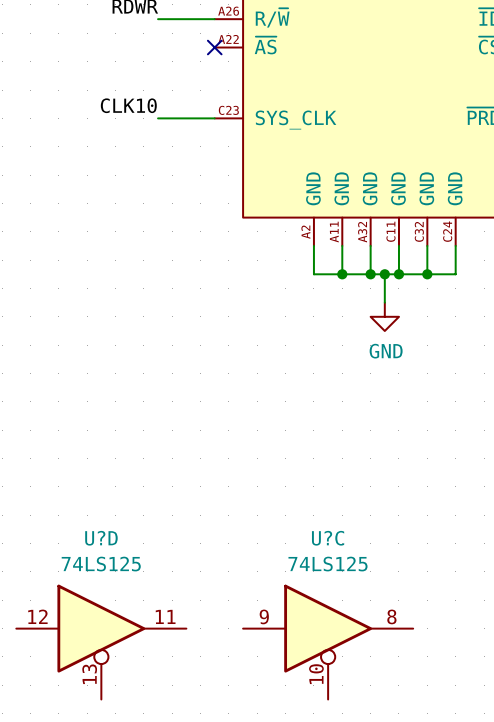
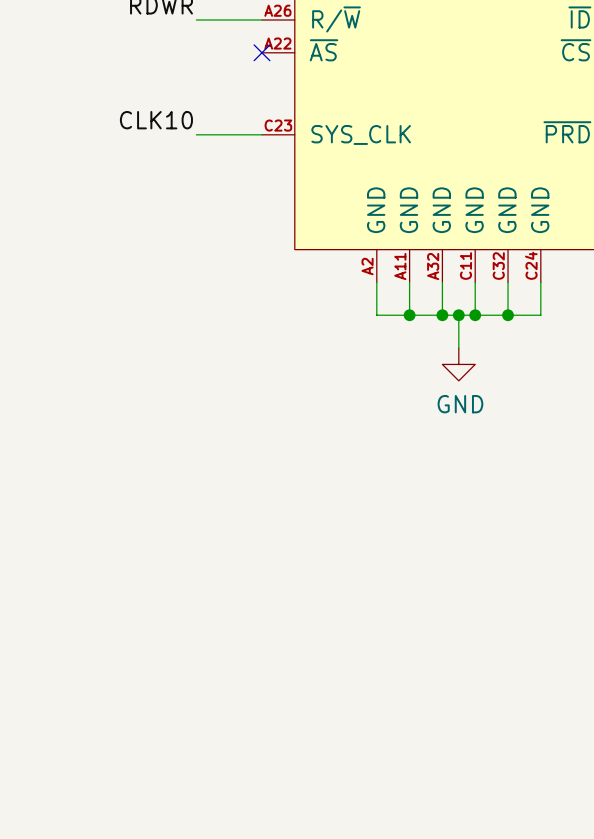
U?D: 74LS125 (101, 642) -> none
U?C: 74LS125 (328, 642) -> none

